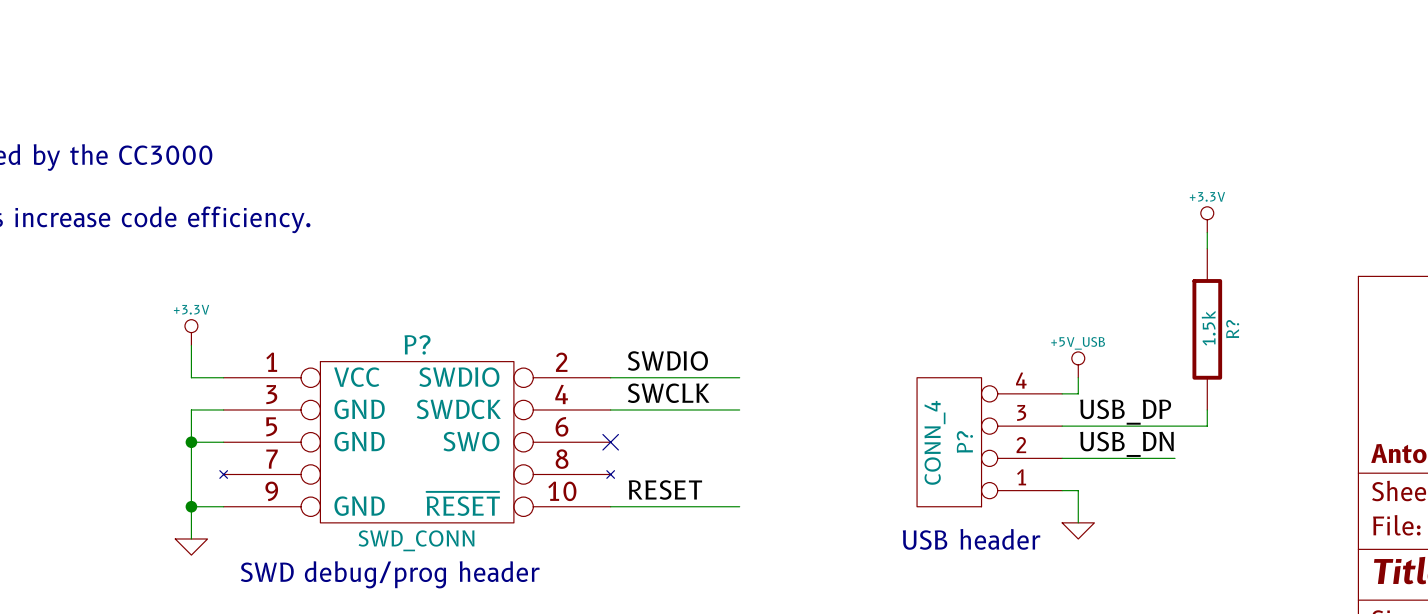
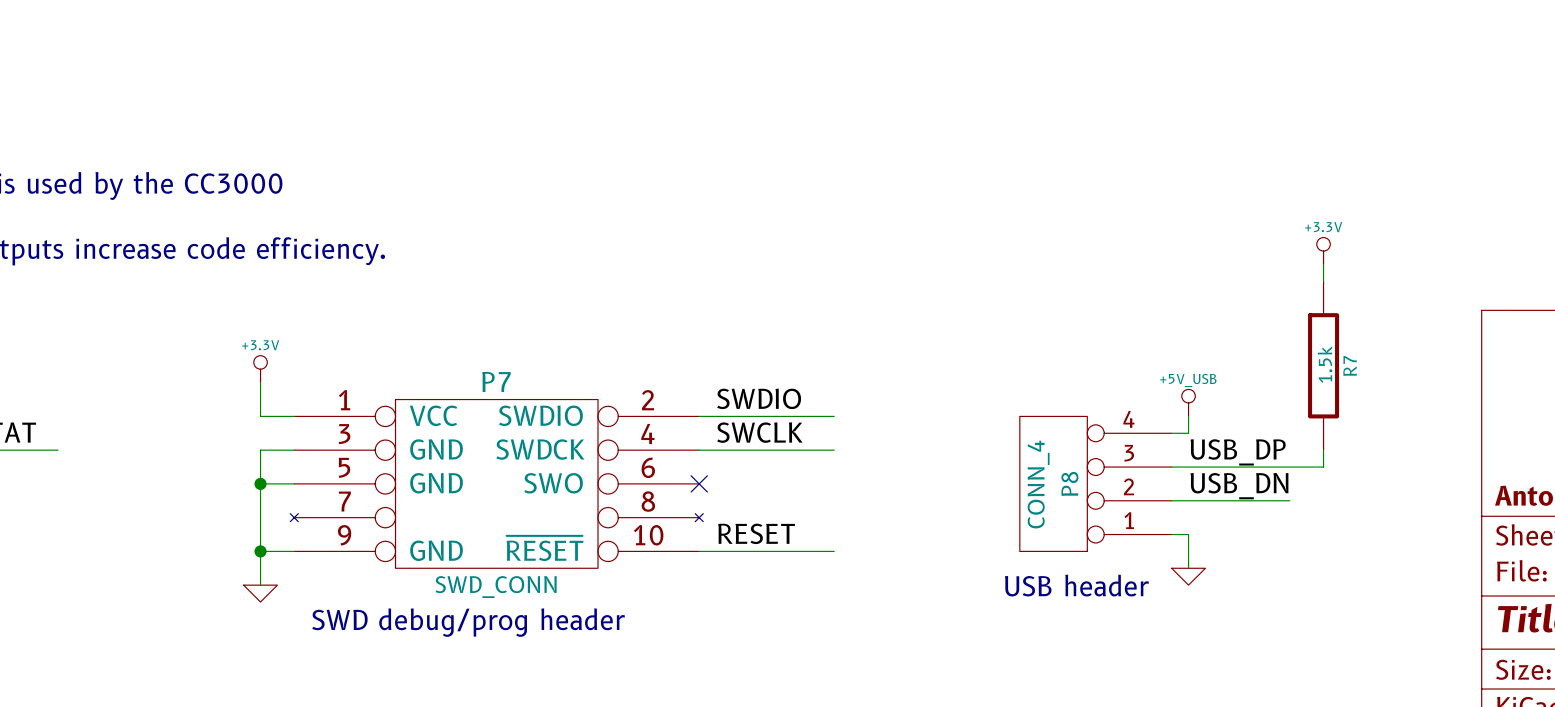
R? name: R? (1232, 329) -> R7 (1350, 366)
P? name: P? (417, 344) -> P7 (496, 381)
P? name: P? (964, 441) -> P8 (1069, 483)

